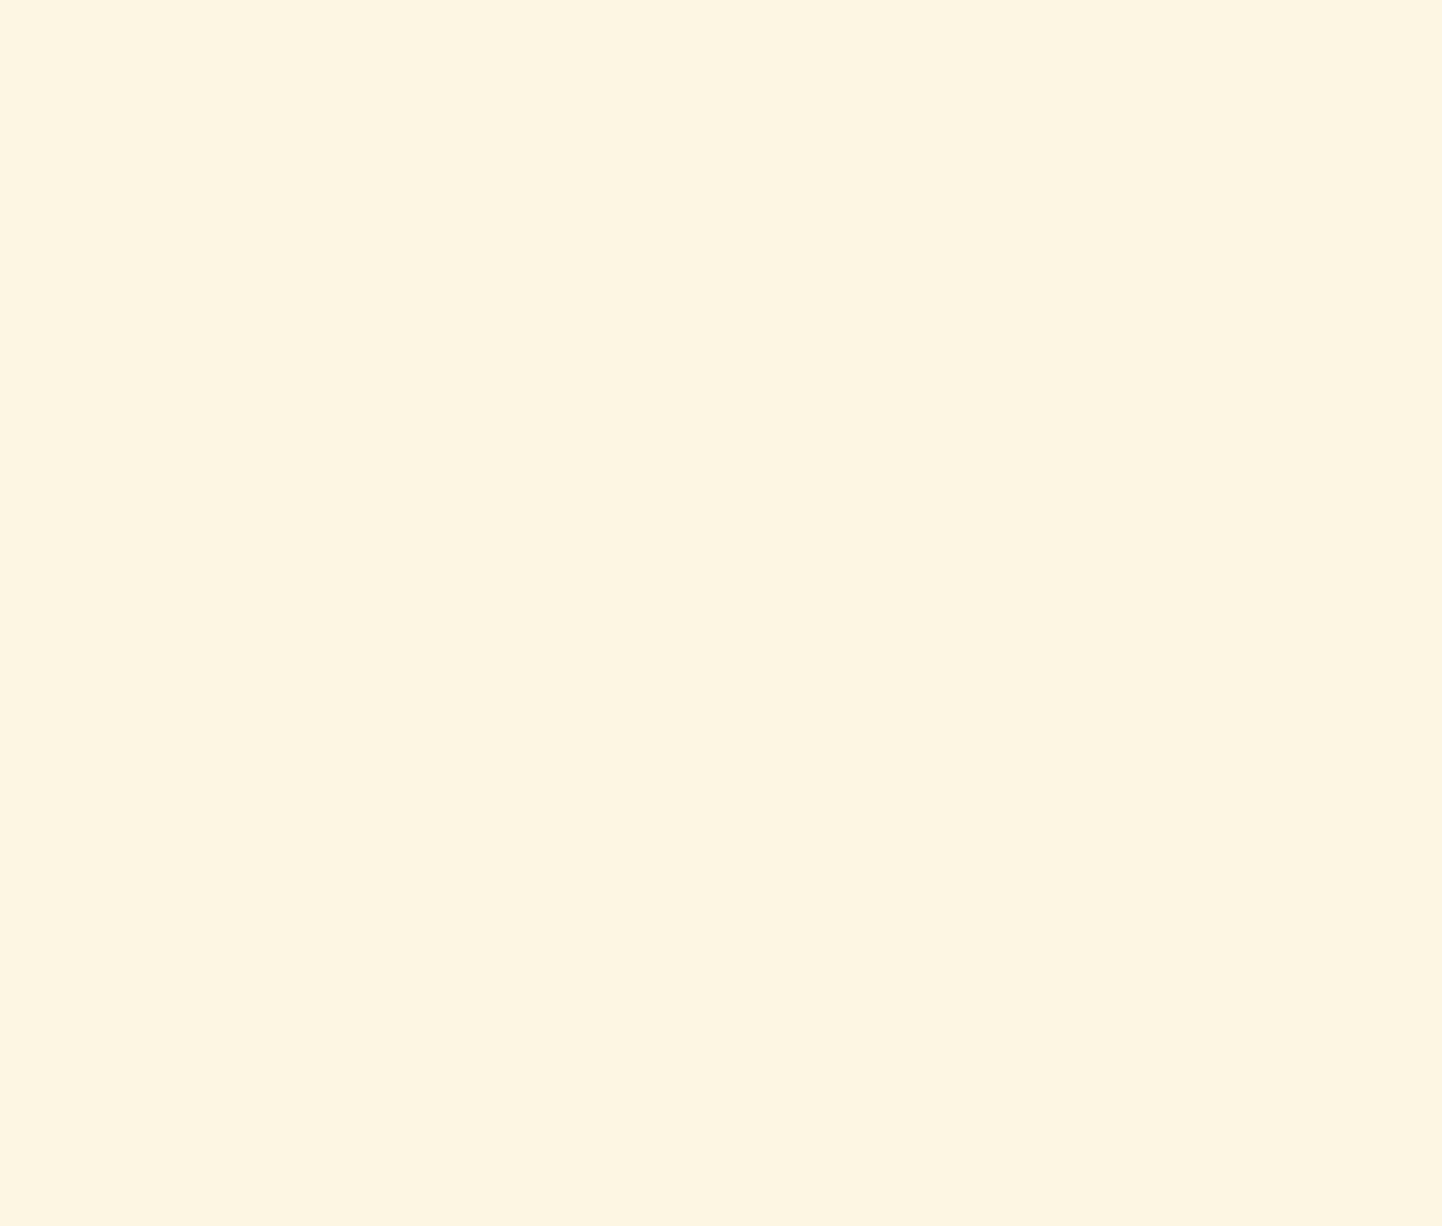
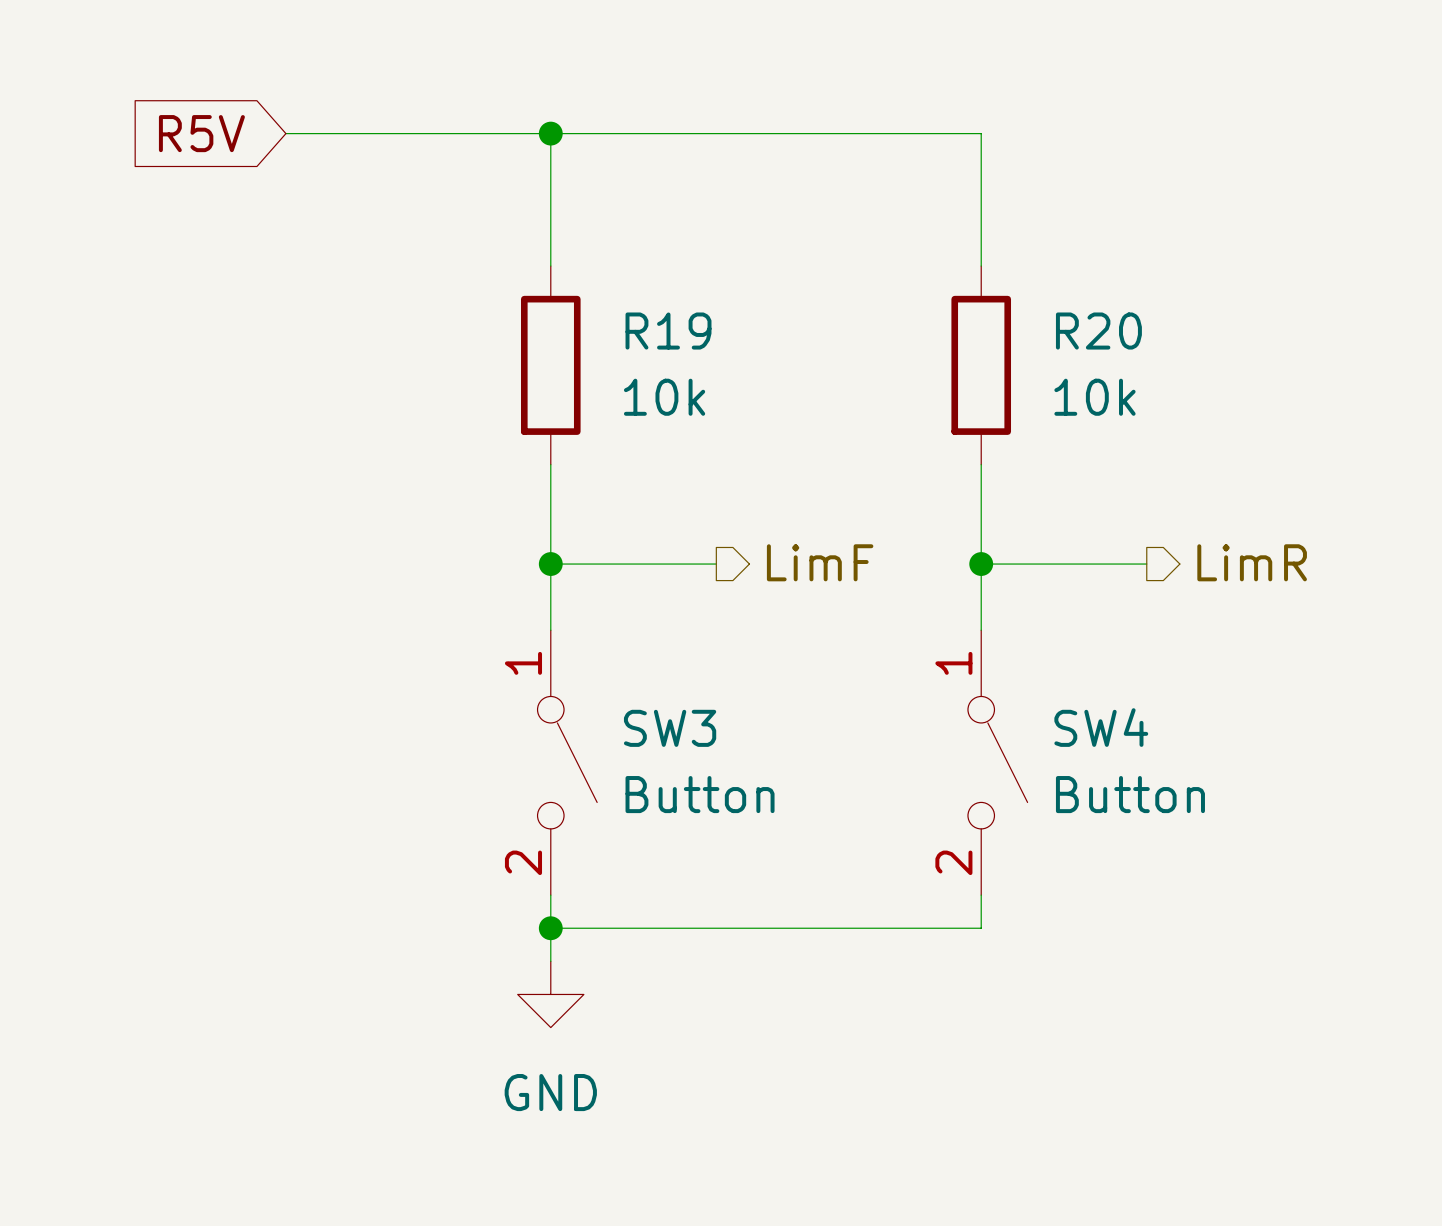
global label: none -> R5V (201, 133)
wire: none -> (285, 133) (981, 133) (981, 266)
wire: none -> (550, 133) (550, 266)
junction: none -> (550, 133)
R19: none -> 10k (550, 365)
R20: none -> 10k (981, 365)
wire: none -> (550, 464) (550, 630)
wire: none -> (981, 464) (981, 630)
hierarchical label: none -> LimF (820, 562)
hierarchical label: none -> LimR (1252, 562)
wire: none -> (550, 564) (716, 564)
junction: none -> (550, 564)
wire: none -> (981, 564) (1146, 564)
junction: none -> (981, 564)
SW3: none -> Button (567, 762)
SW4: none -> Button (997, 762)
wire: none -> (550, 895) (550, 961)
wire: none -> (981, 895) (981, 928) (550, 928)
junction: none -> (550, 928)
power symbol: none -> GND (550, 994)

